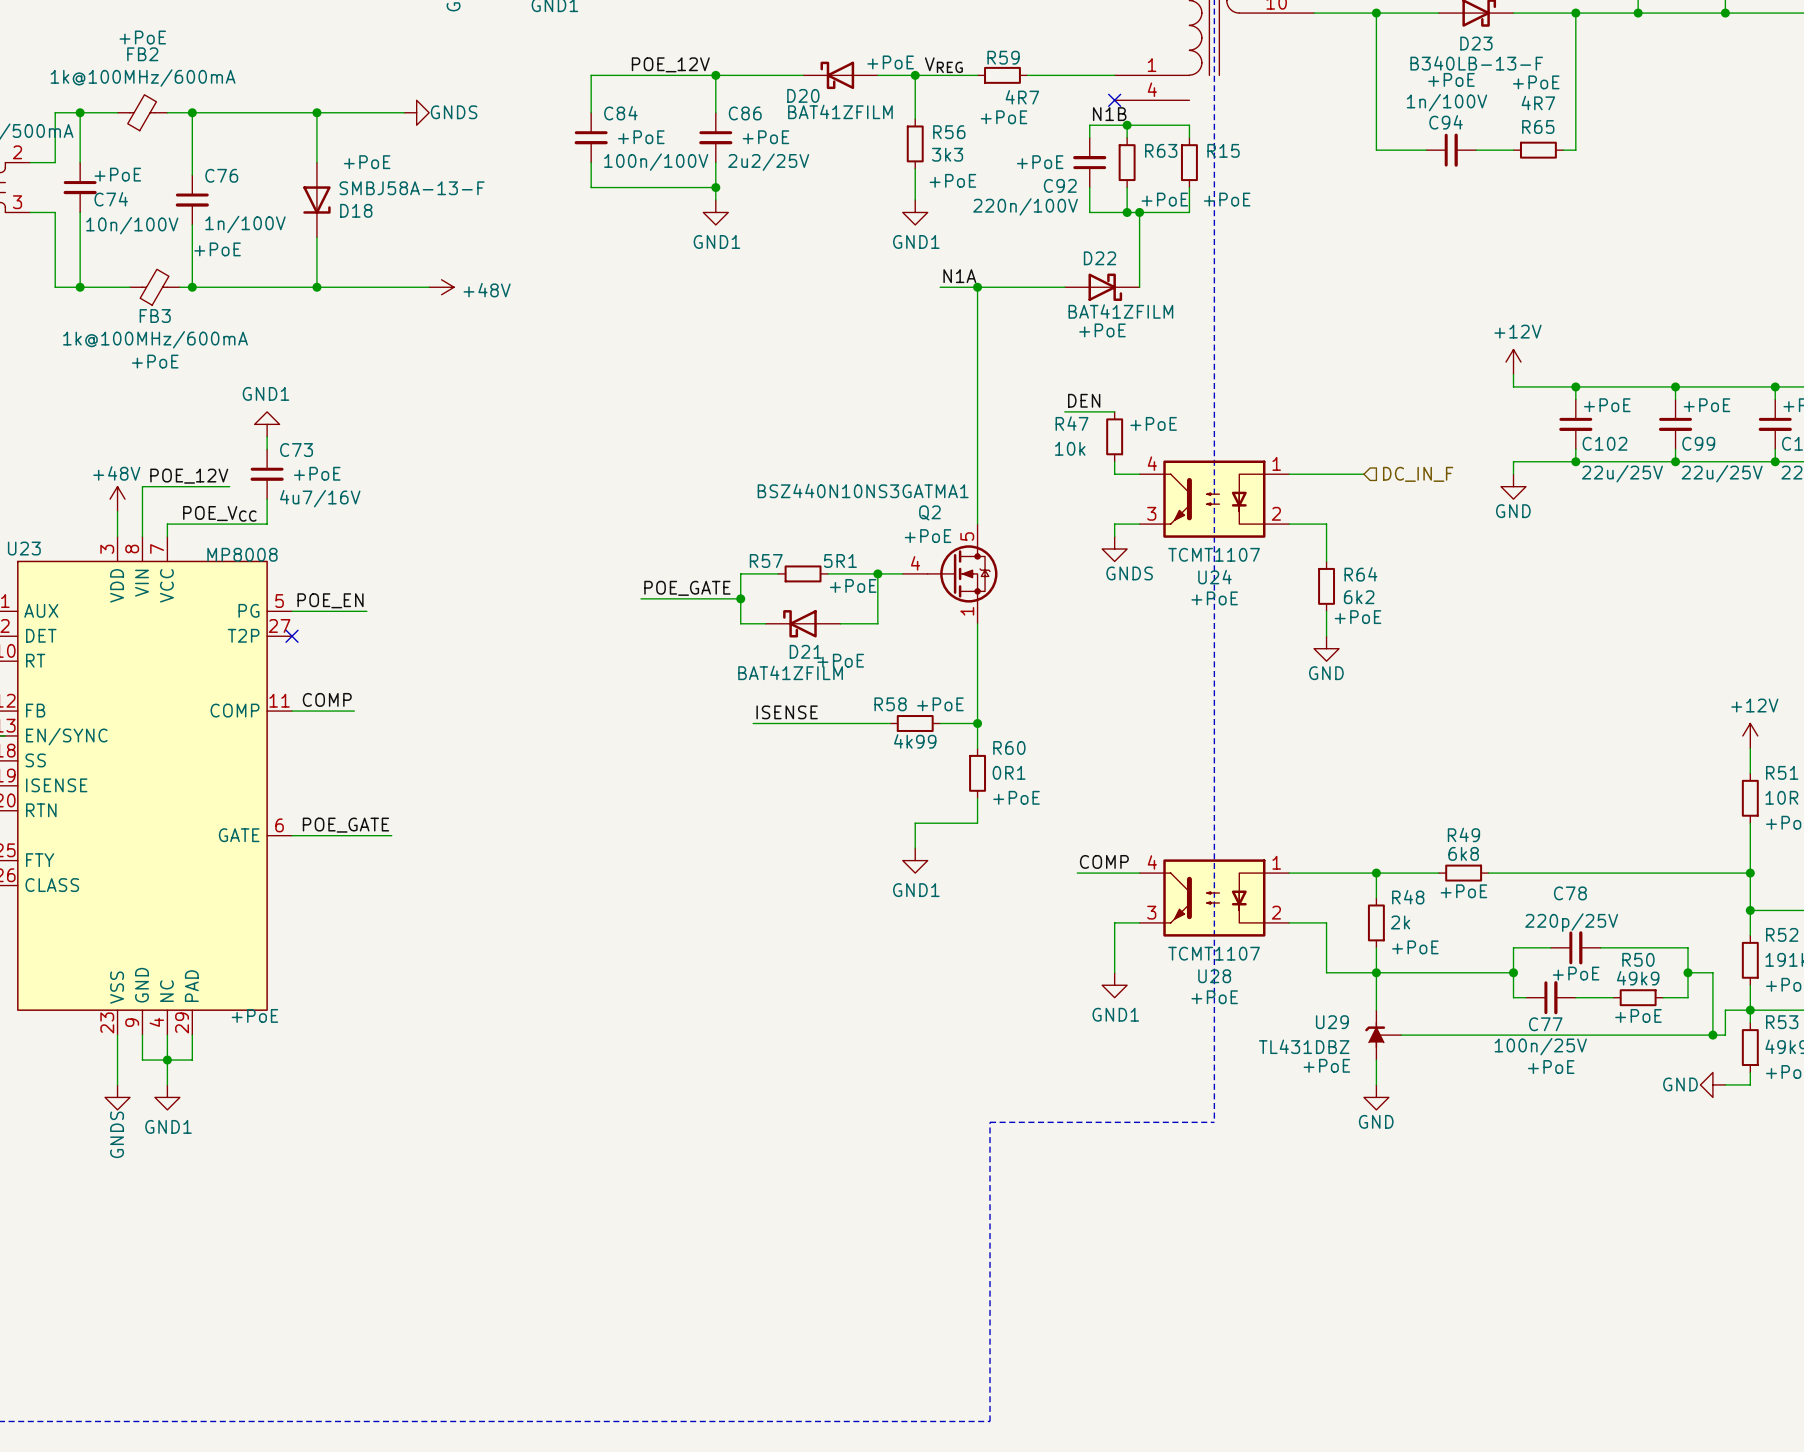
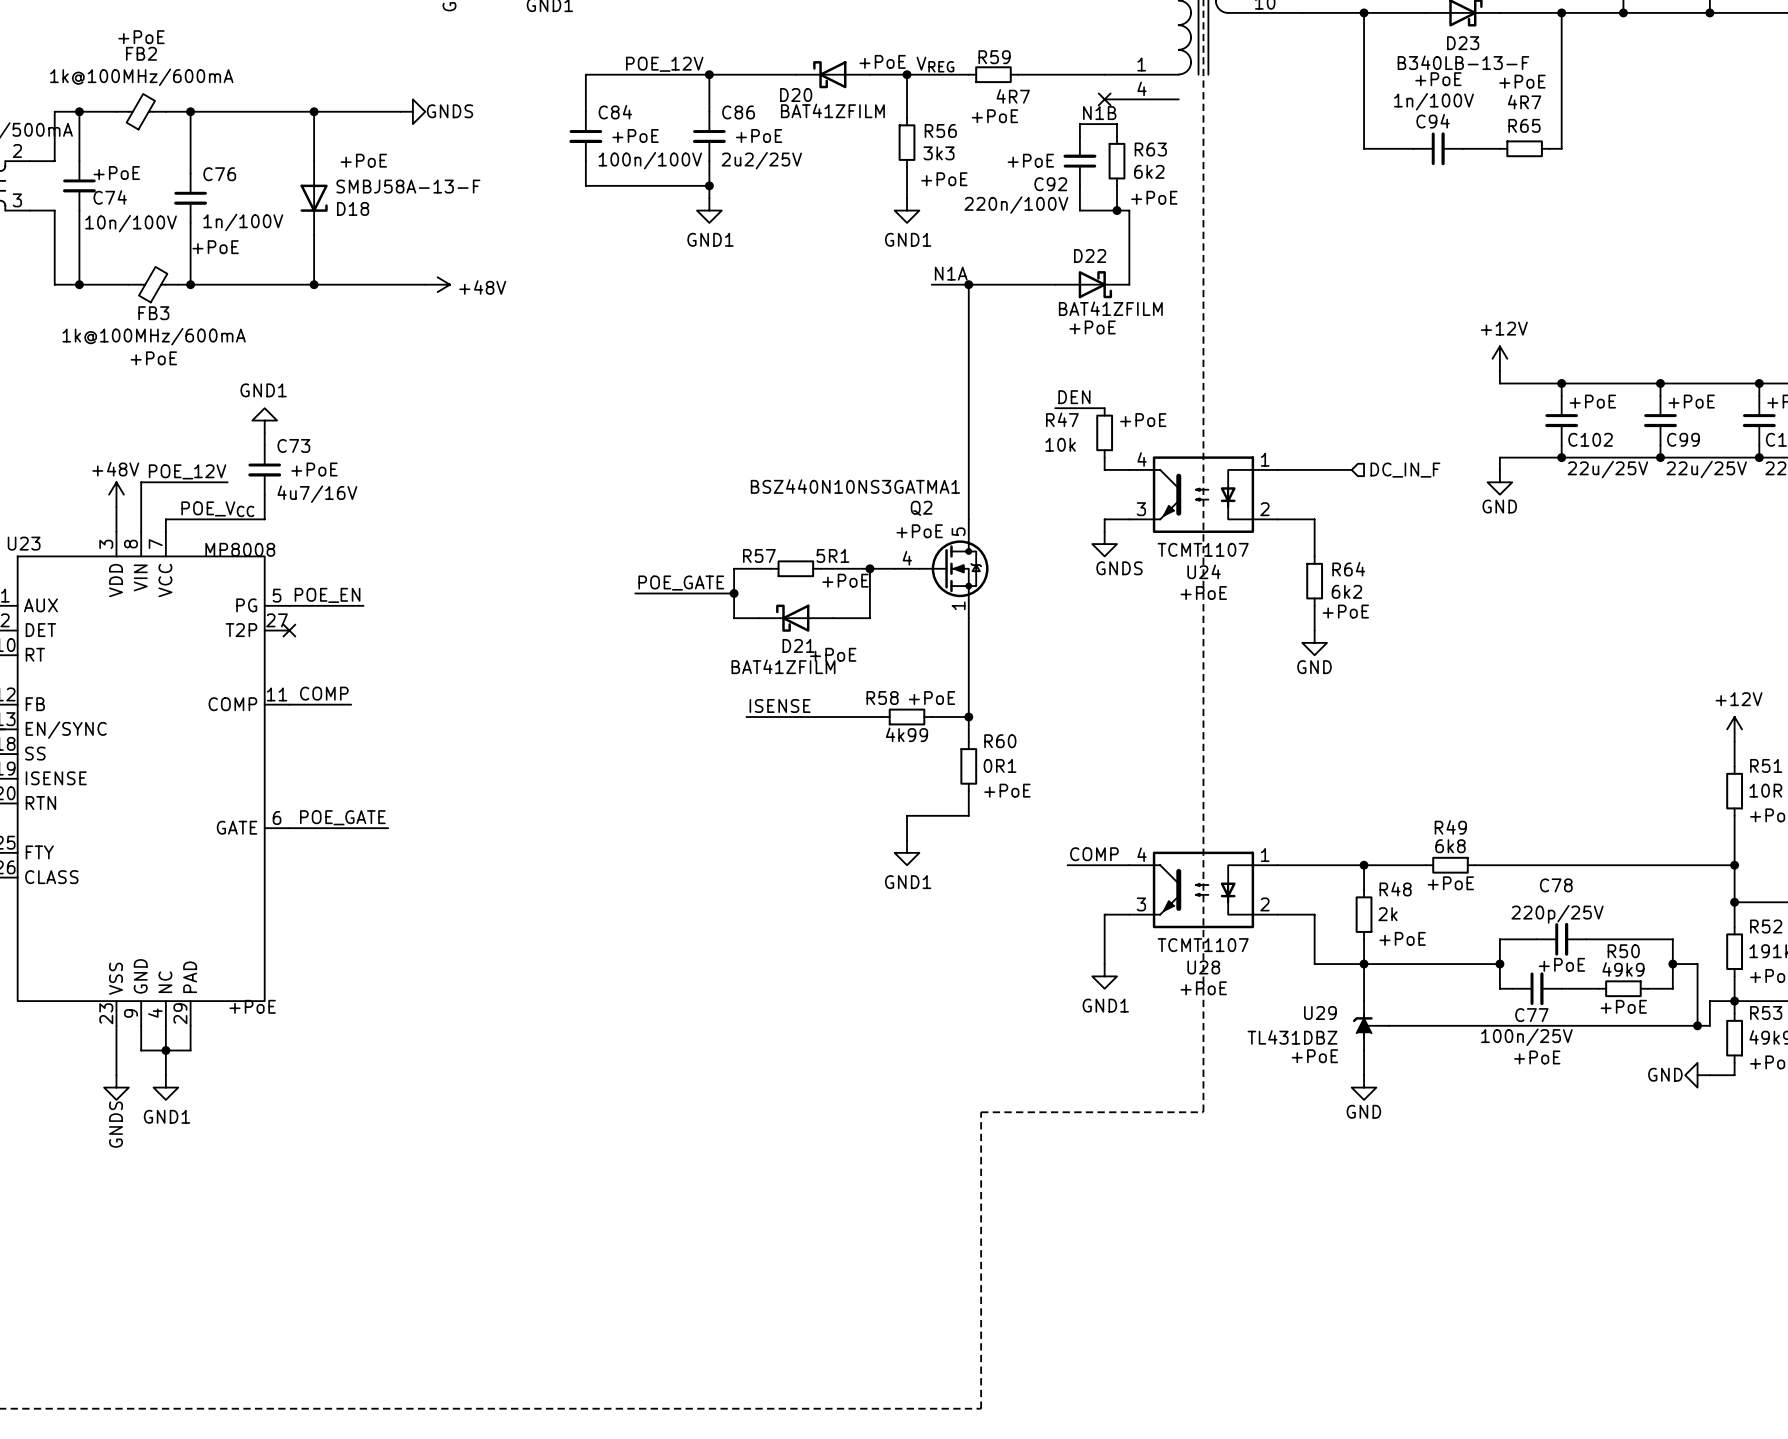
wire: (1127, 125) (1189, 125) (1189, 137) -> none
junction: (1127, 125) -> none
R15: (1189, 162) -> none
R63 value: none -> 6k2 (1149, 171)
wire: (1189, 187) (1189, 212) (1139, 212) -> none
junction: (1139, 212) -> none

